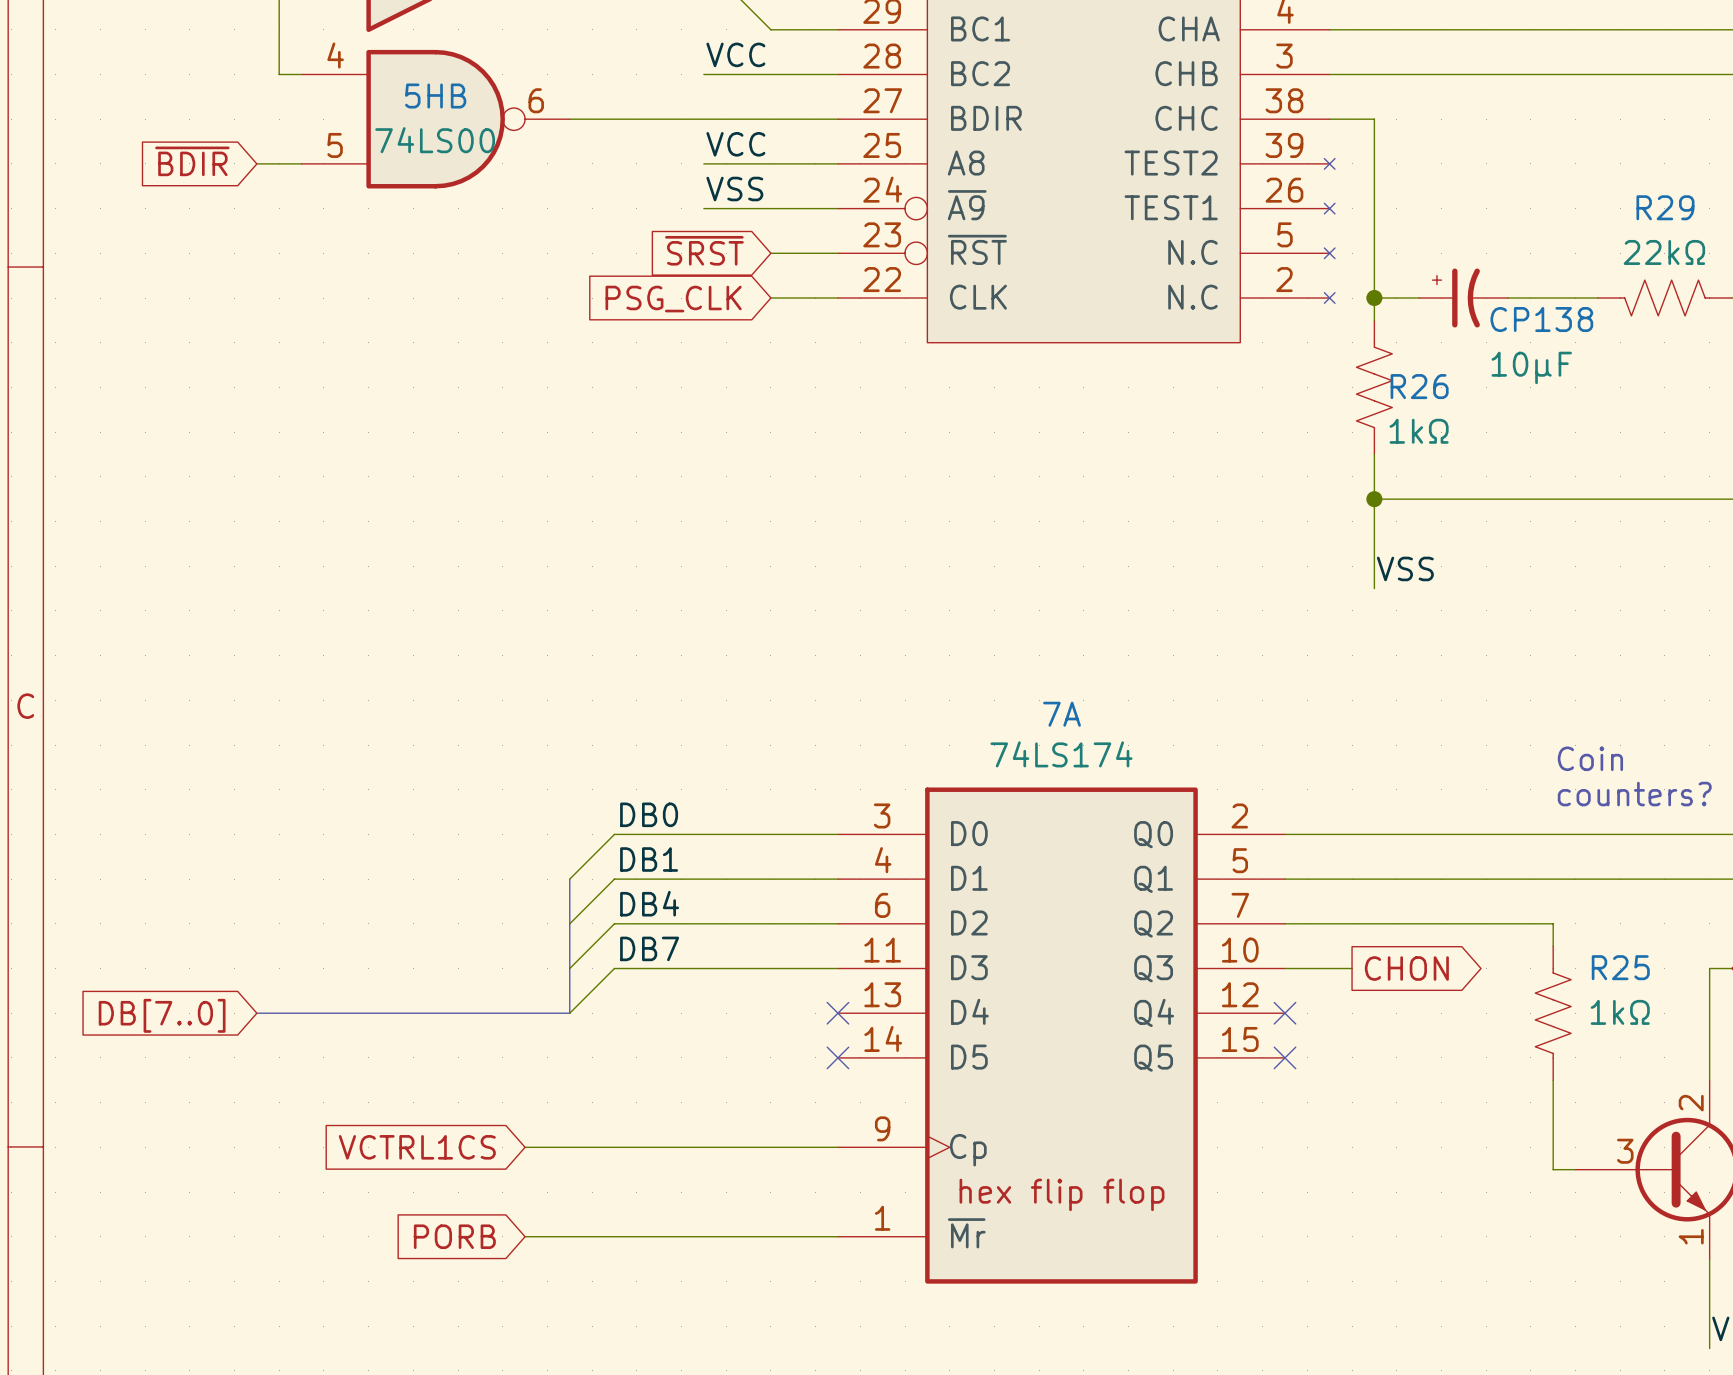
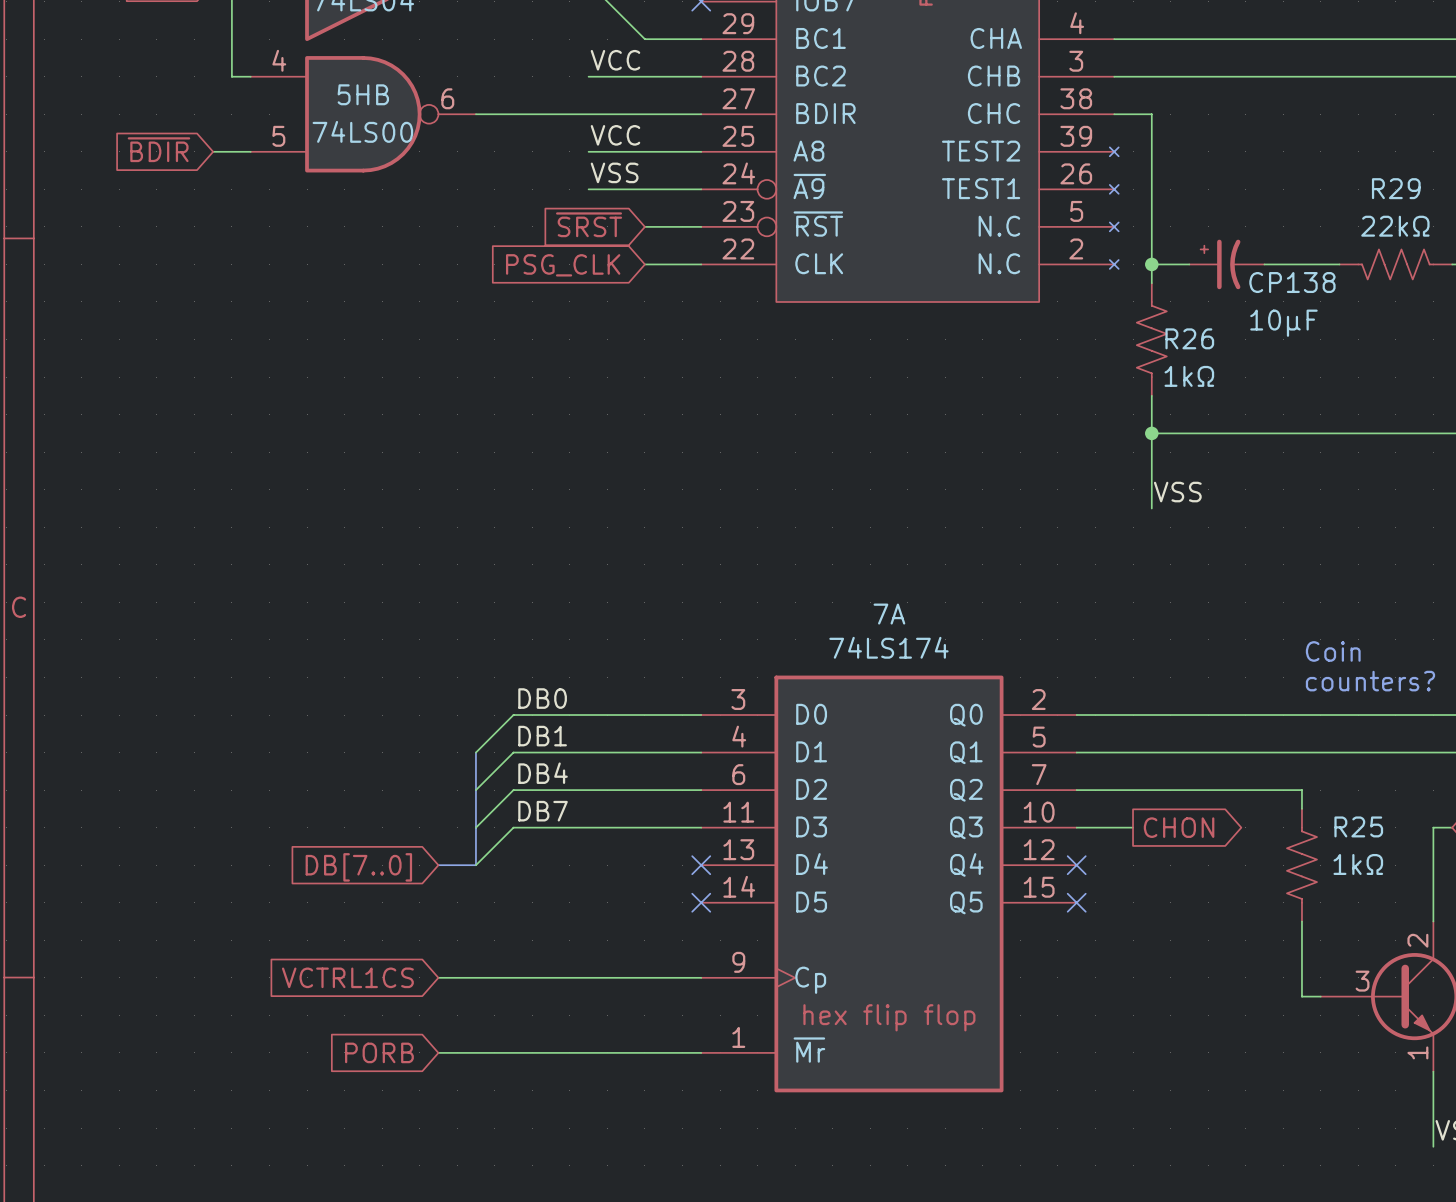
bus: (256, 1013) (525, 1013) -> none
global label position: DB[7..0] (162, 1015) -> DB[7..0] (358, 867)

